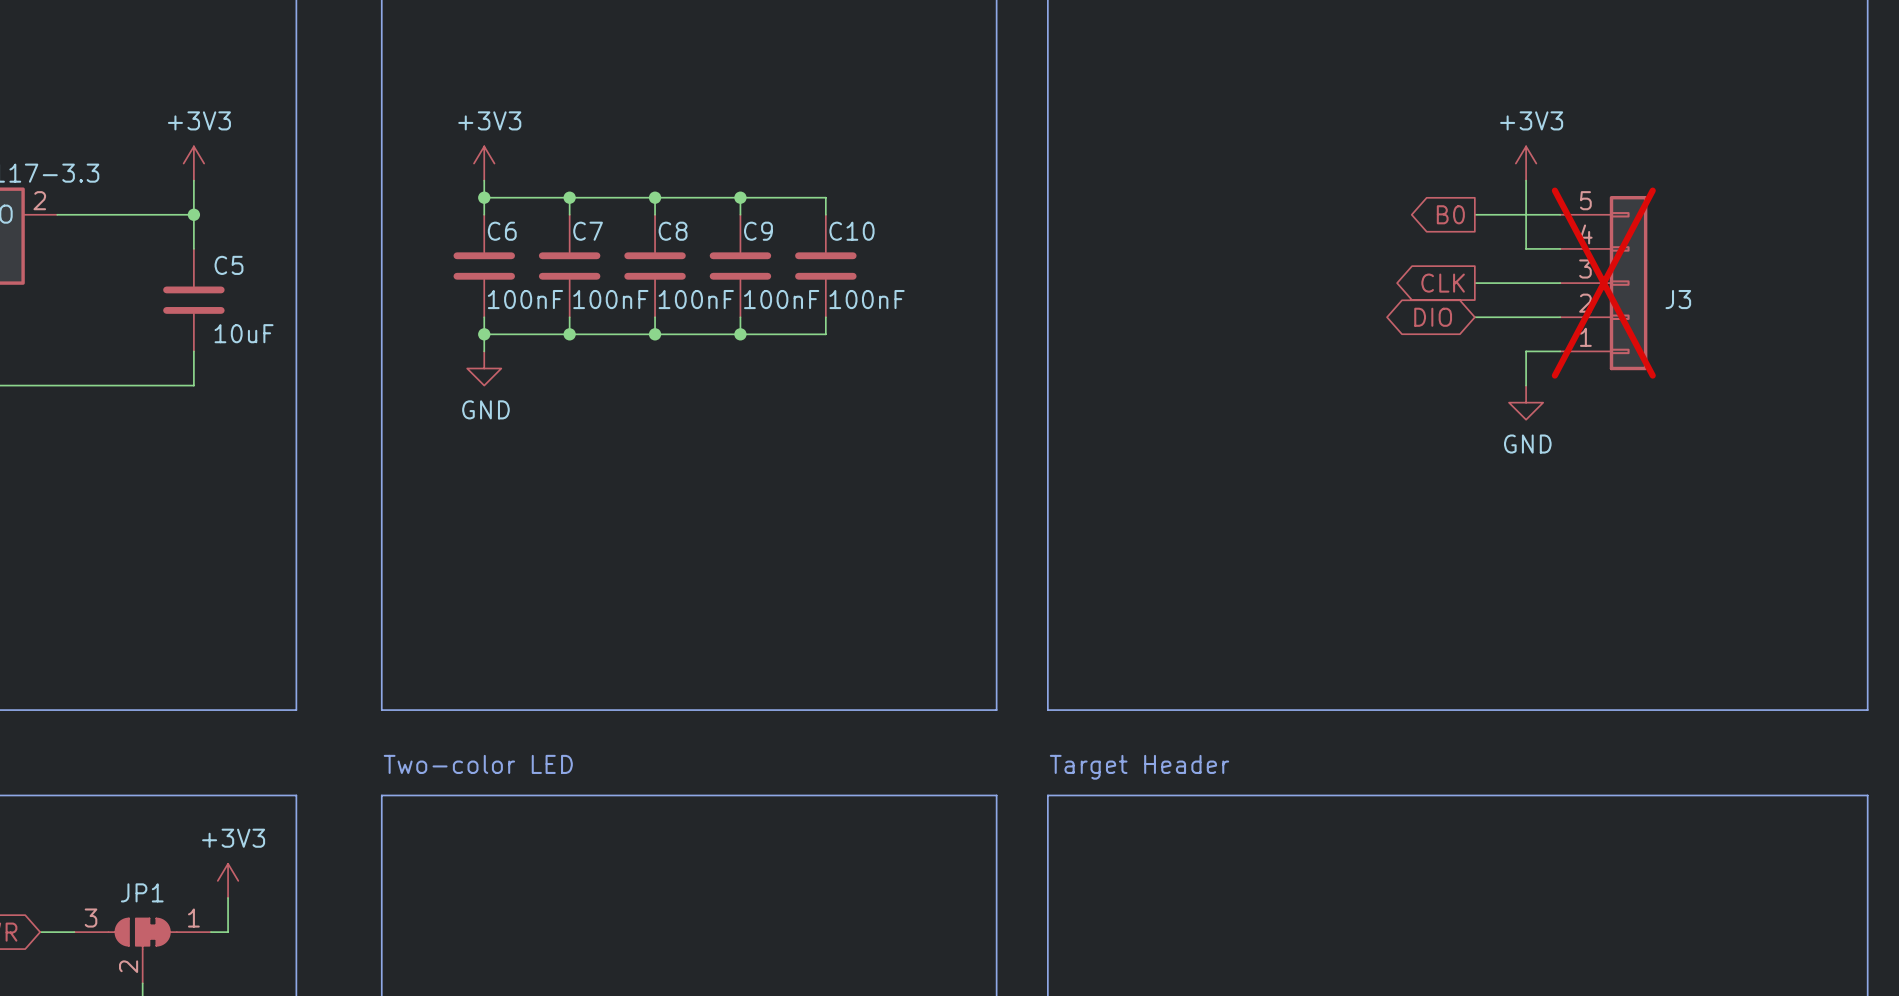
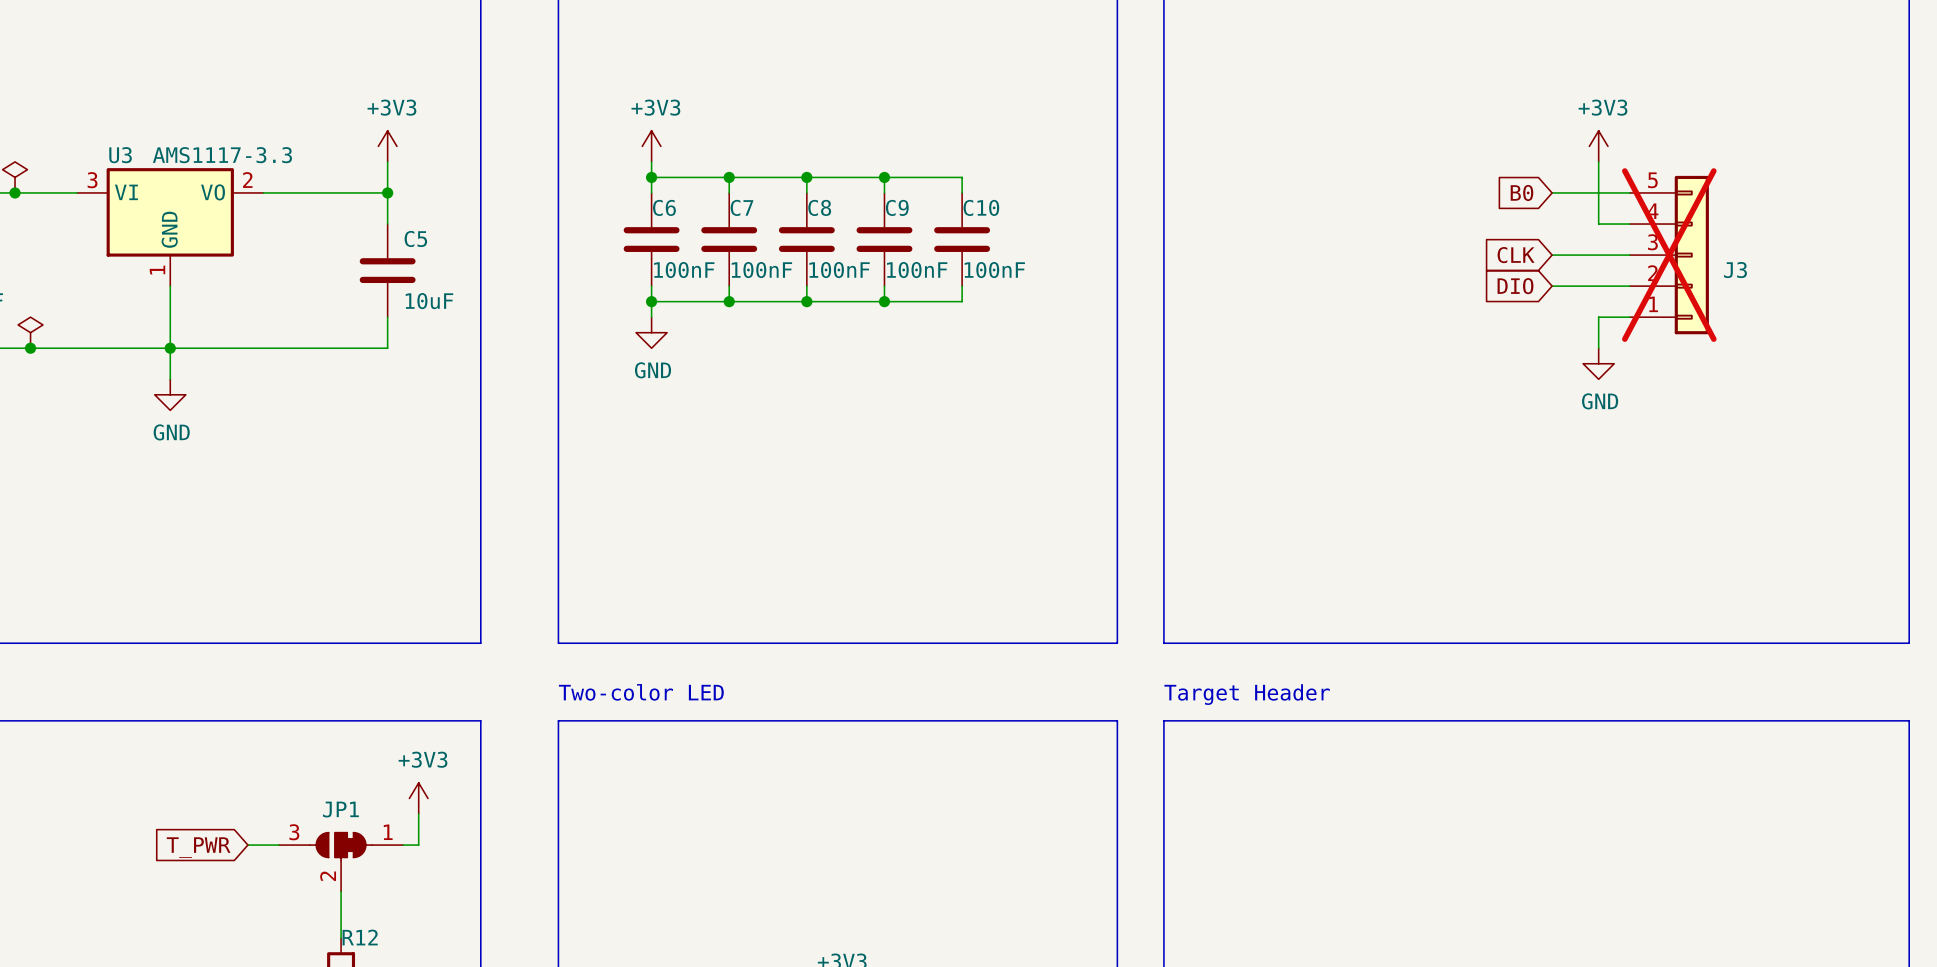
global label shape: output (1450, 214) -> input (1521, 192)
global label shape: output (1443, 283) -> input (1516, 255)
global label shape: bidirectional (1433, 317) -> input (1515, 286)

